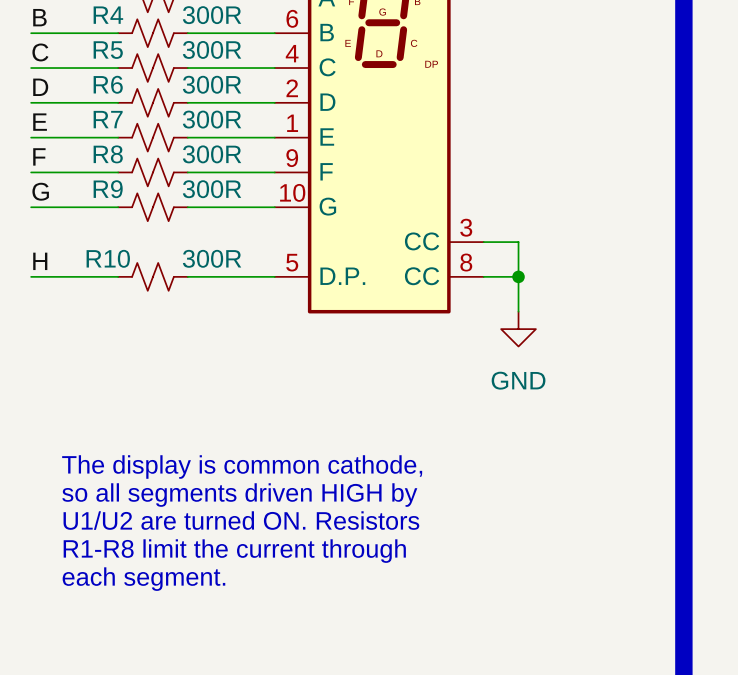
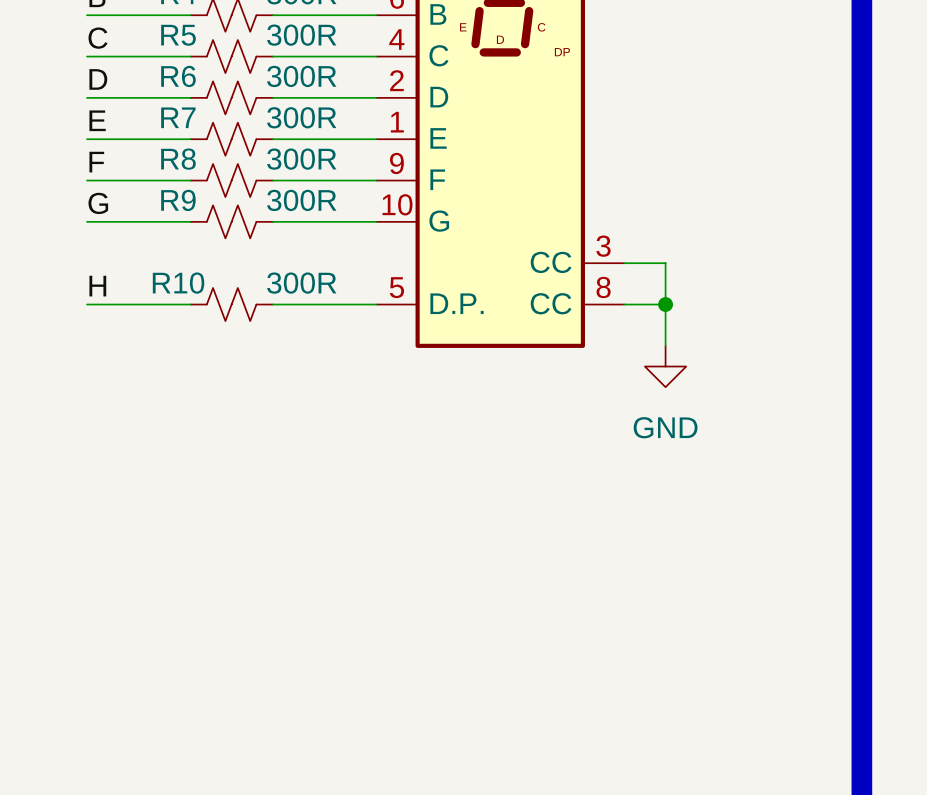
text: The display is common cathode, (242, 467) -> none
text: so all segments driven HIGH by (239, 495) -> none
text: U1/U2 are turned ON. Resistors (241, 520) -> none
text: R1-R8 limit the current through (234, 551) -> none
text: each segment. (143, 579) -> none

